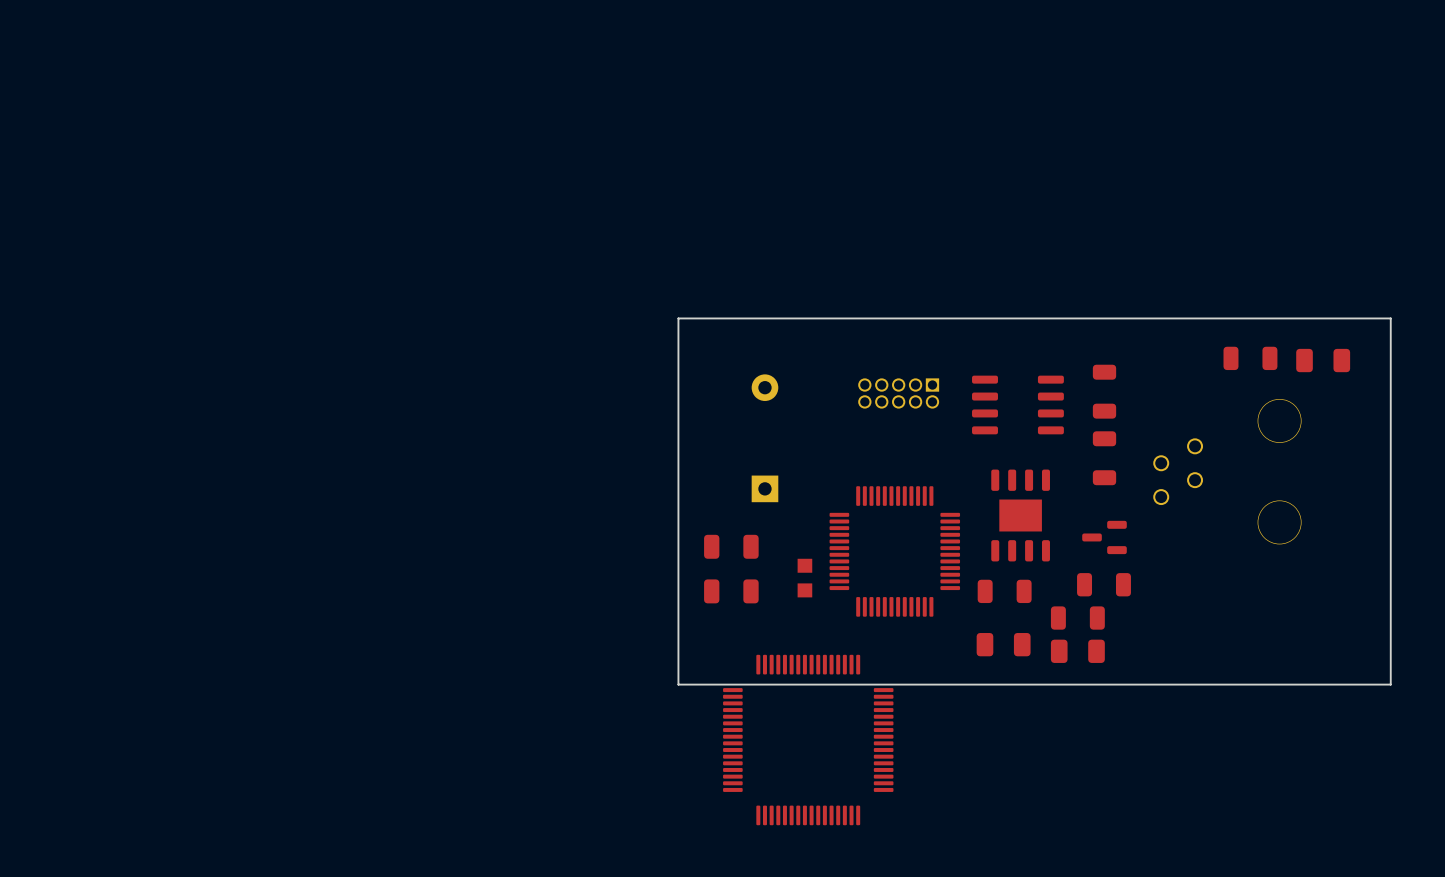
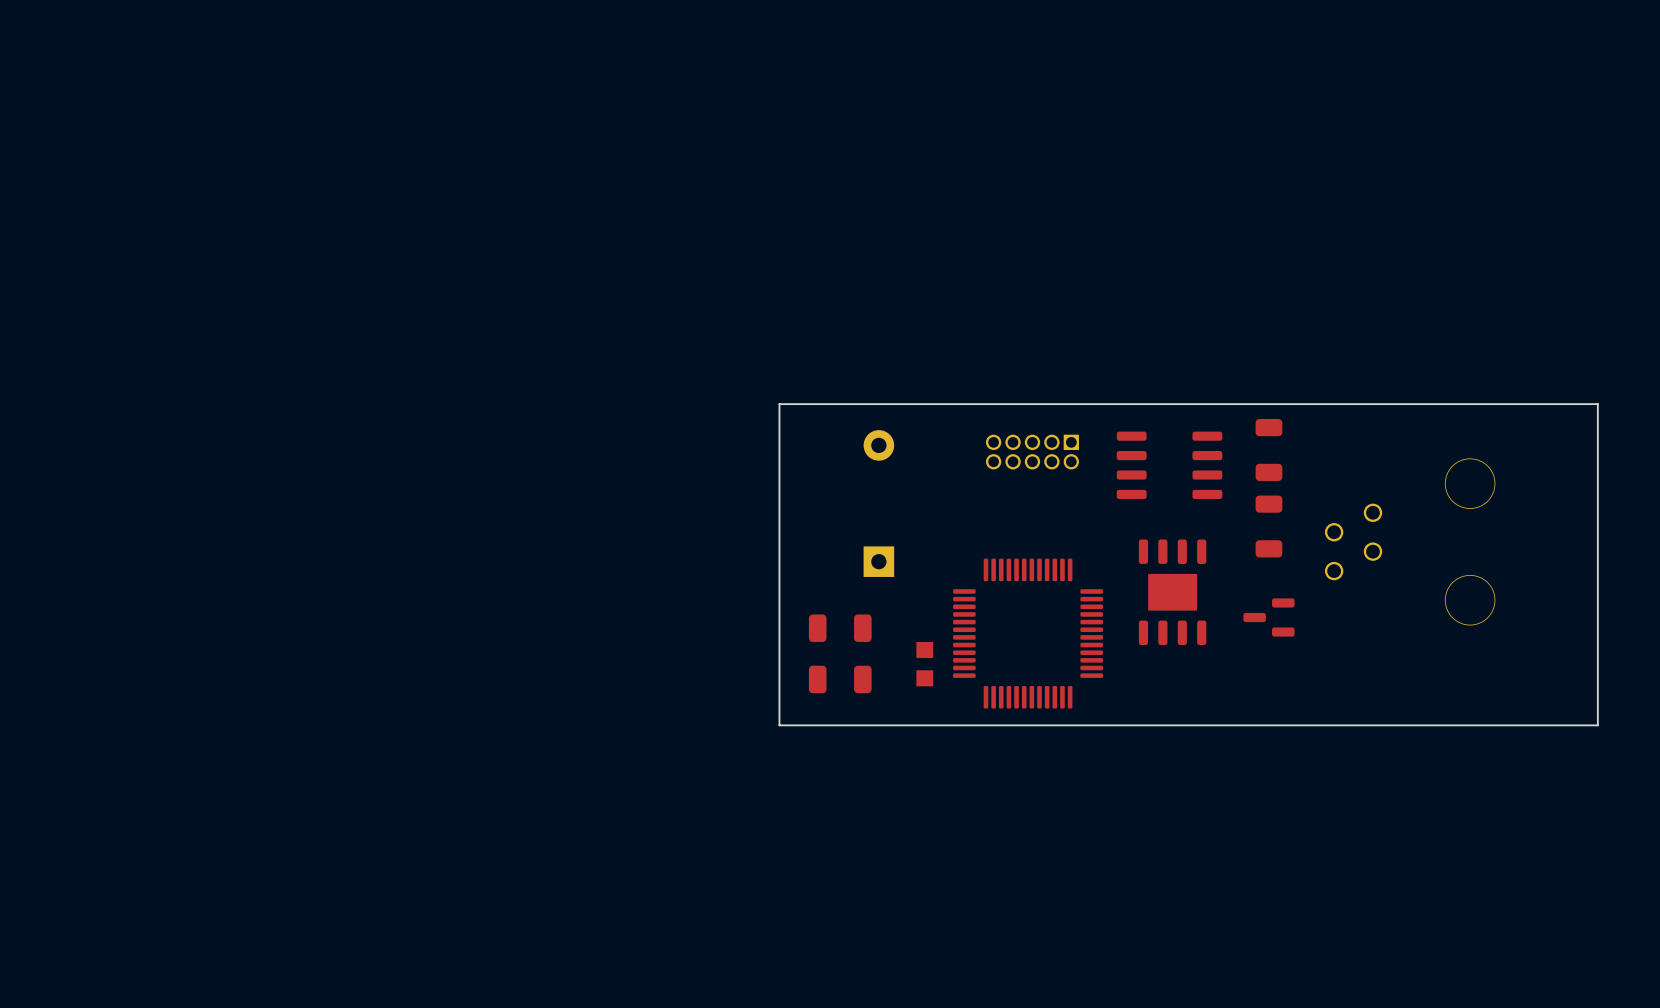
board edge: (1390, 351) (1390, 318) (678, 318) (678, 351) -> (1597, 404) (779, 404)
part: (1250, 358) -> none
part: (1323, 360) -> none
part: (1104, 584) -> none
part: (1004, 591) -> none
part: (1077, 618) -> none
board edge: (1390, 631) (1390, 684) (678, 684) (678, 631) -> (1597, 725) (779, 725)
part: (1003, 644) -> none
part: (1077, 651) -> none
part: (808, 740) -> none

